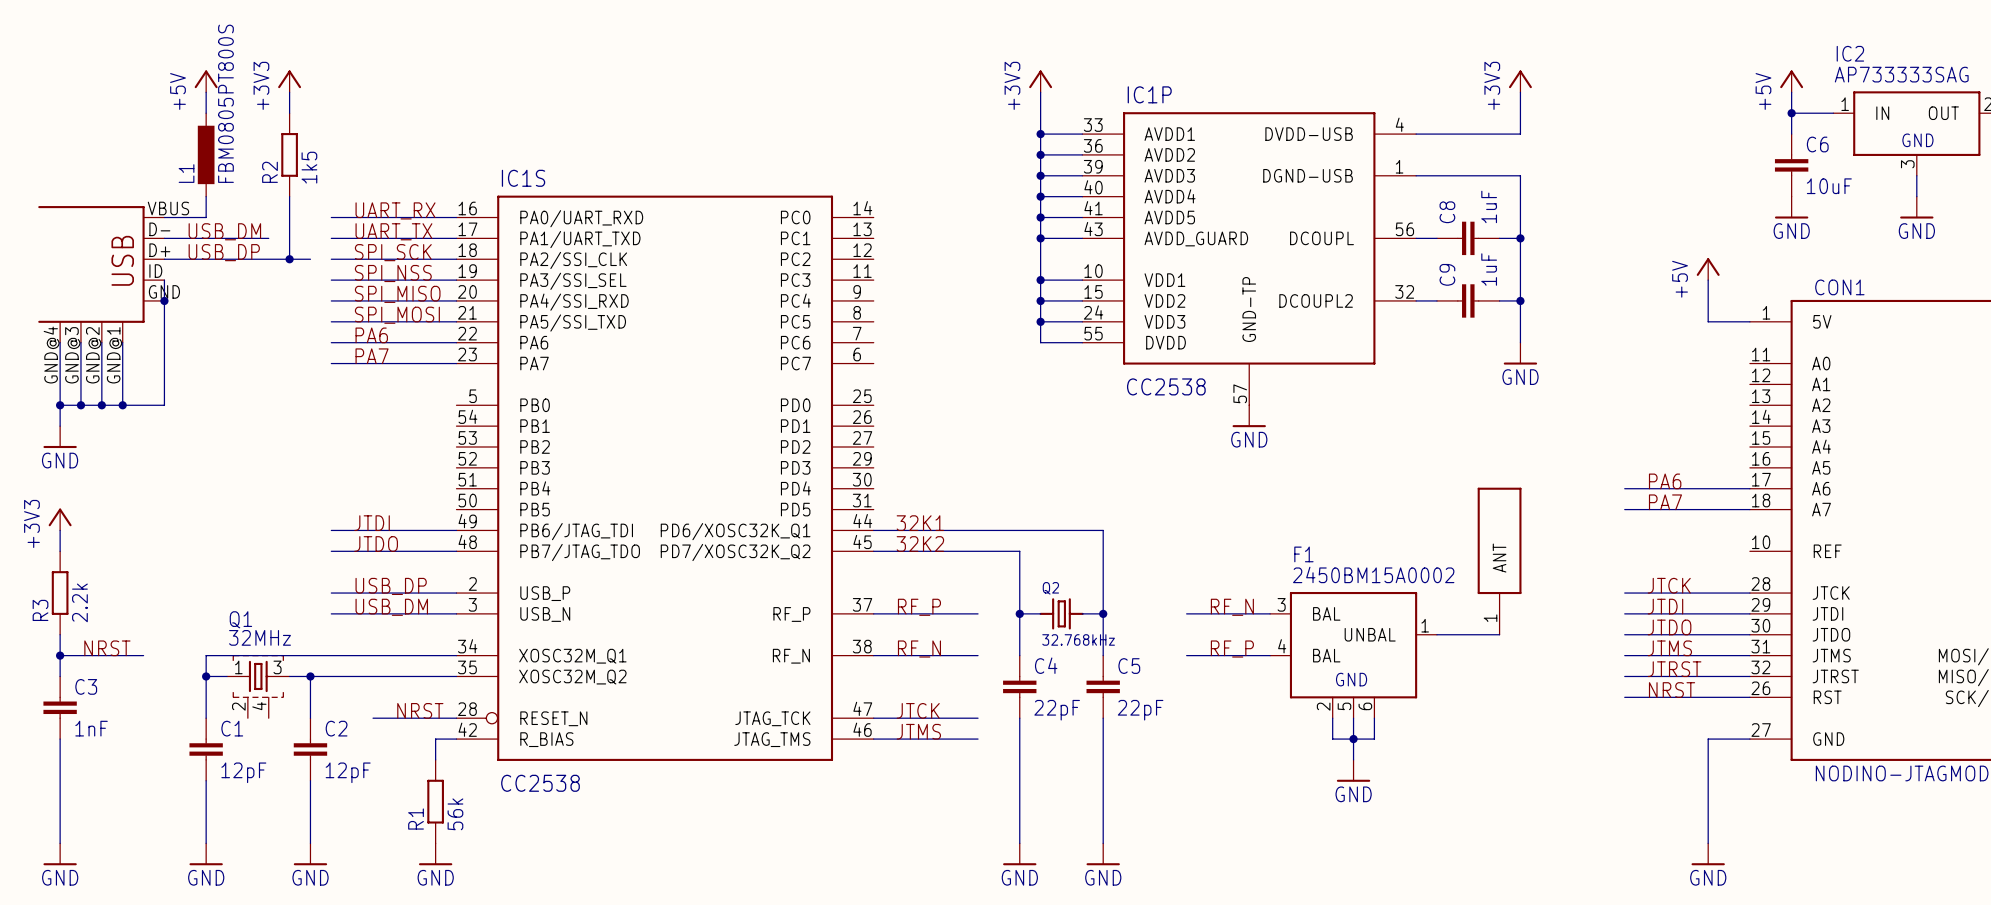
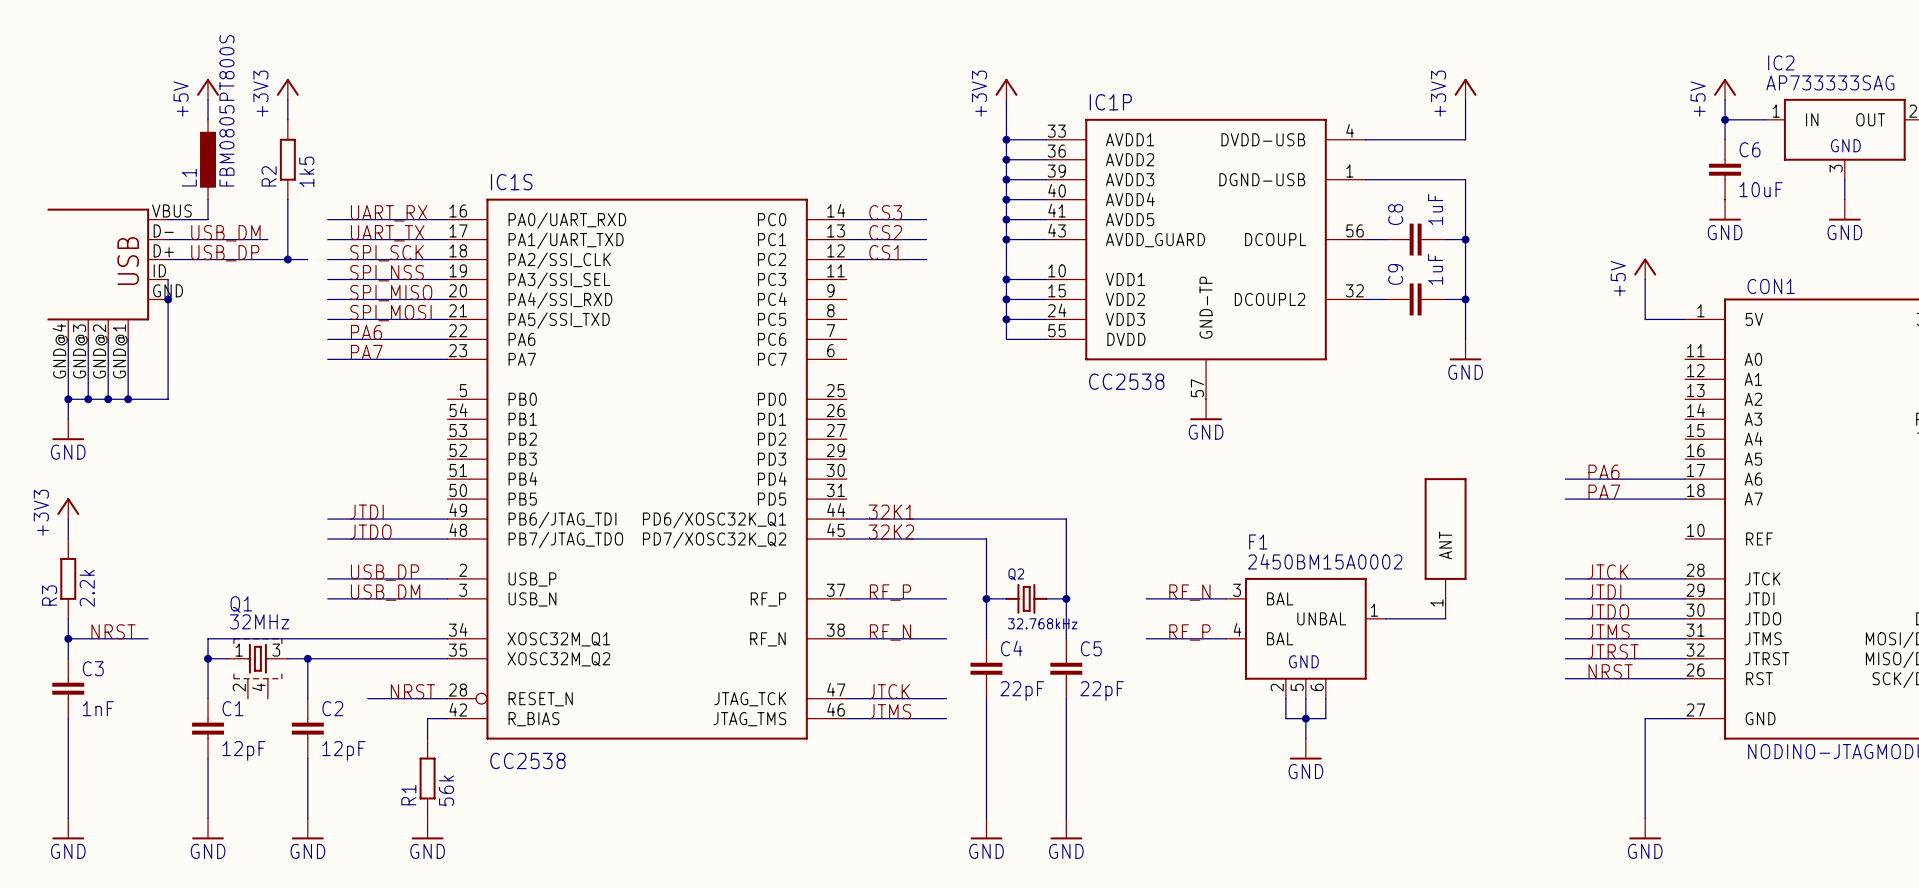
label: none -> CS3 (885, 212)
wire: none -> (846, 219) (926, 219)
label: none -> CS2 (885, 232)
wire: none -> (846, 239) (926, 239)
label: none -> CS1 (885, 252)
wire: none -> (846, 259) (926, 259)

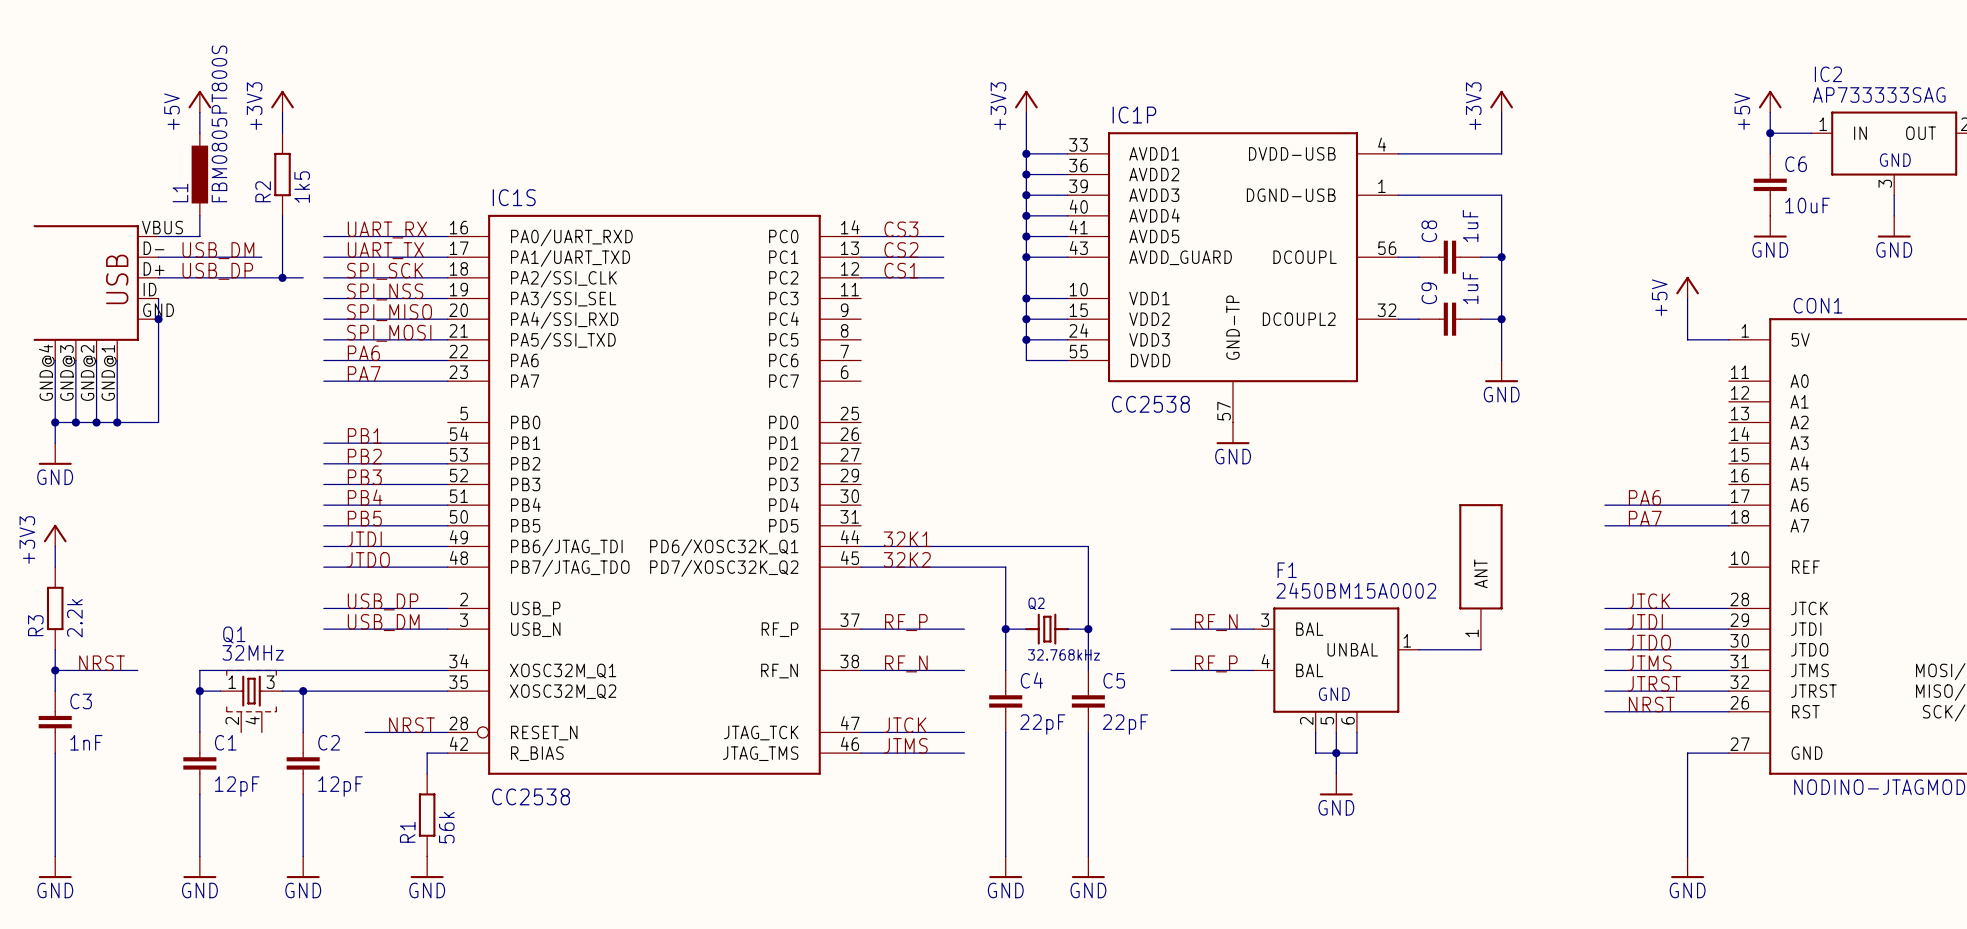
label: none -> PB1 (364, 435)
wire: none -> (323, 443) (447, 443)
label: none -> PB2 (364, 456)
wire: none -> (323, 463) (447, 463)
label: none -> PB3 (364, 477)
wire: none -> (323, 484) (447, 484)
label: none -> PB4 (365, 497)
wire: none -> (323, 505) (447, 505)
label: none -> PB5 (364, 518)
wire: none -> (323, 525) (447, 525)

